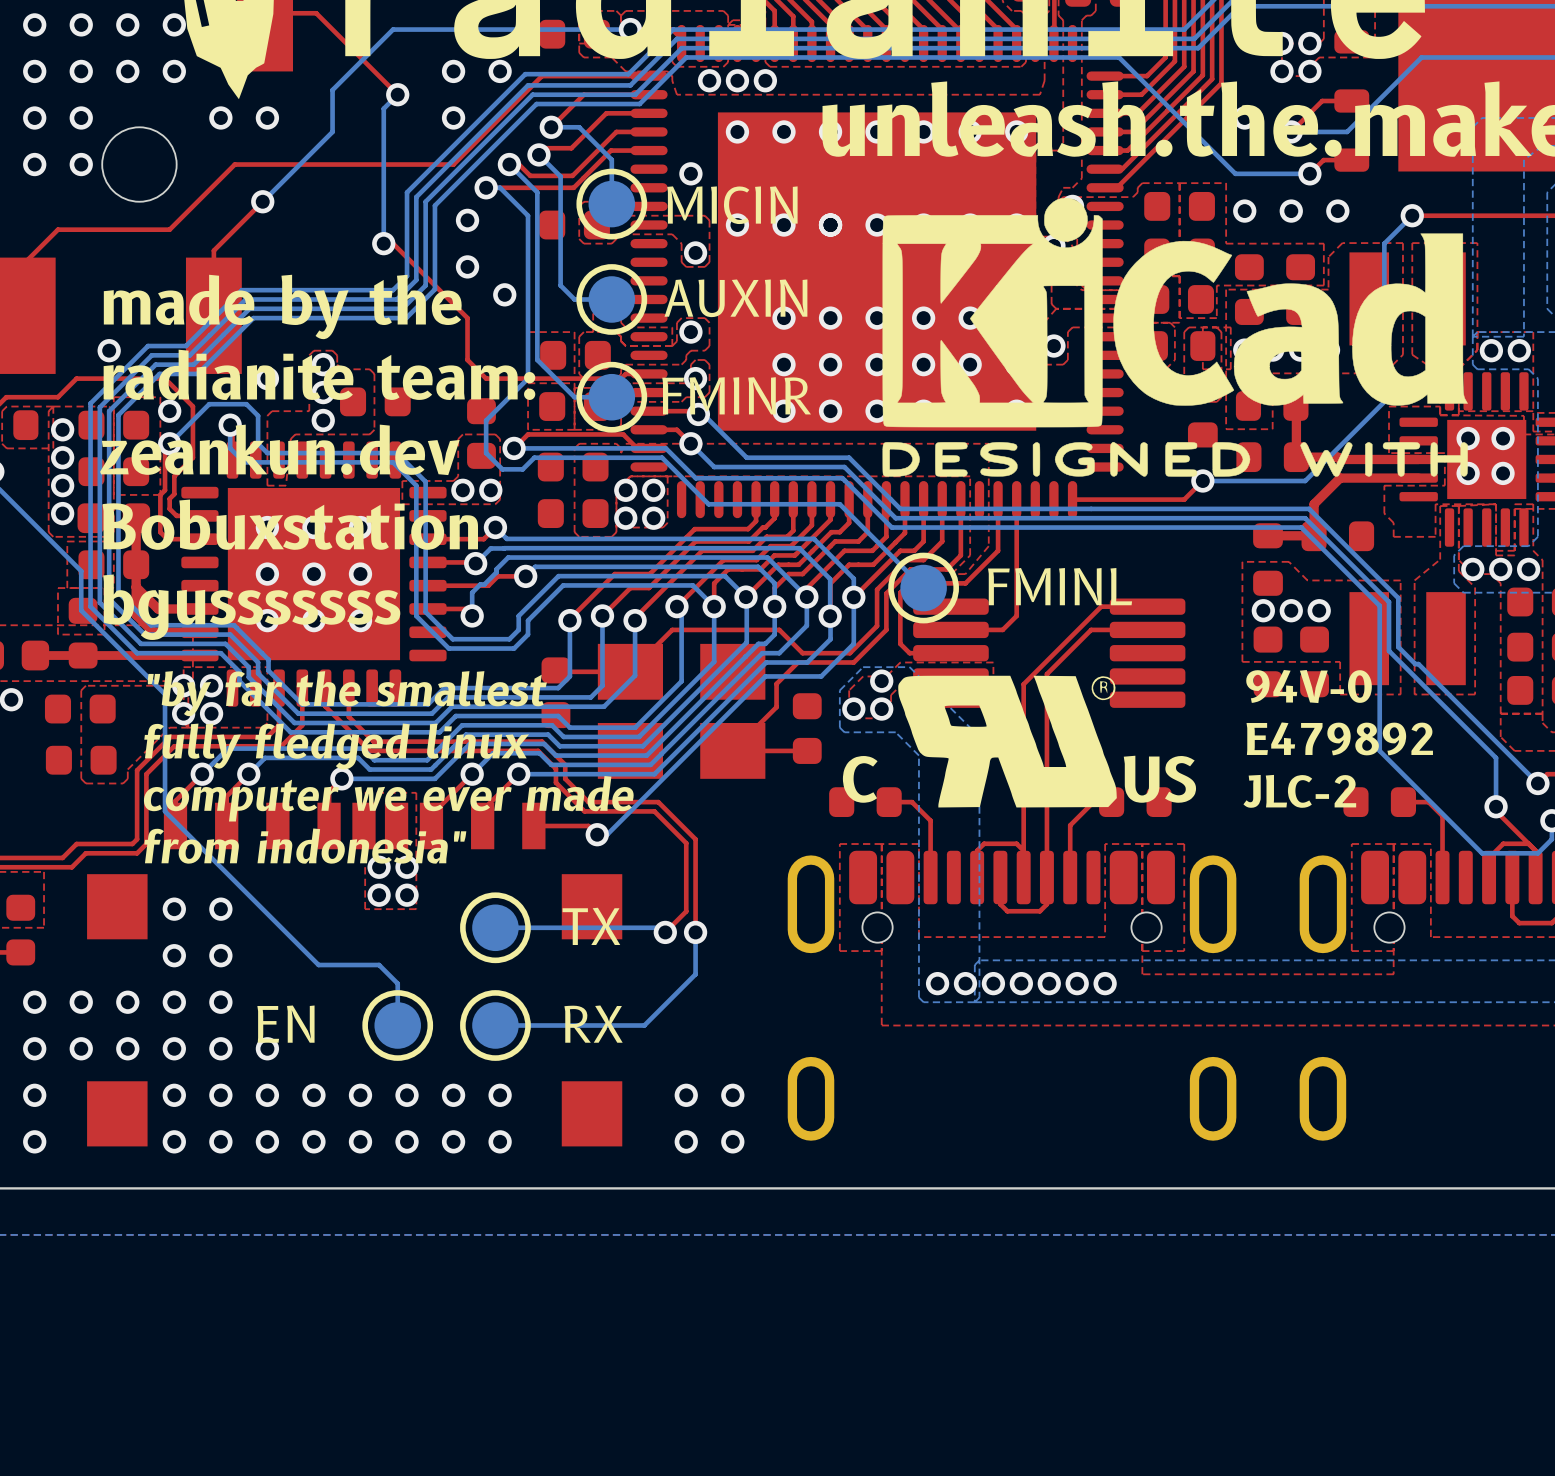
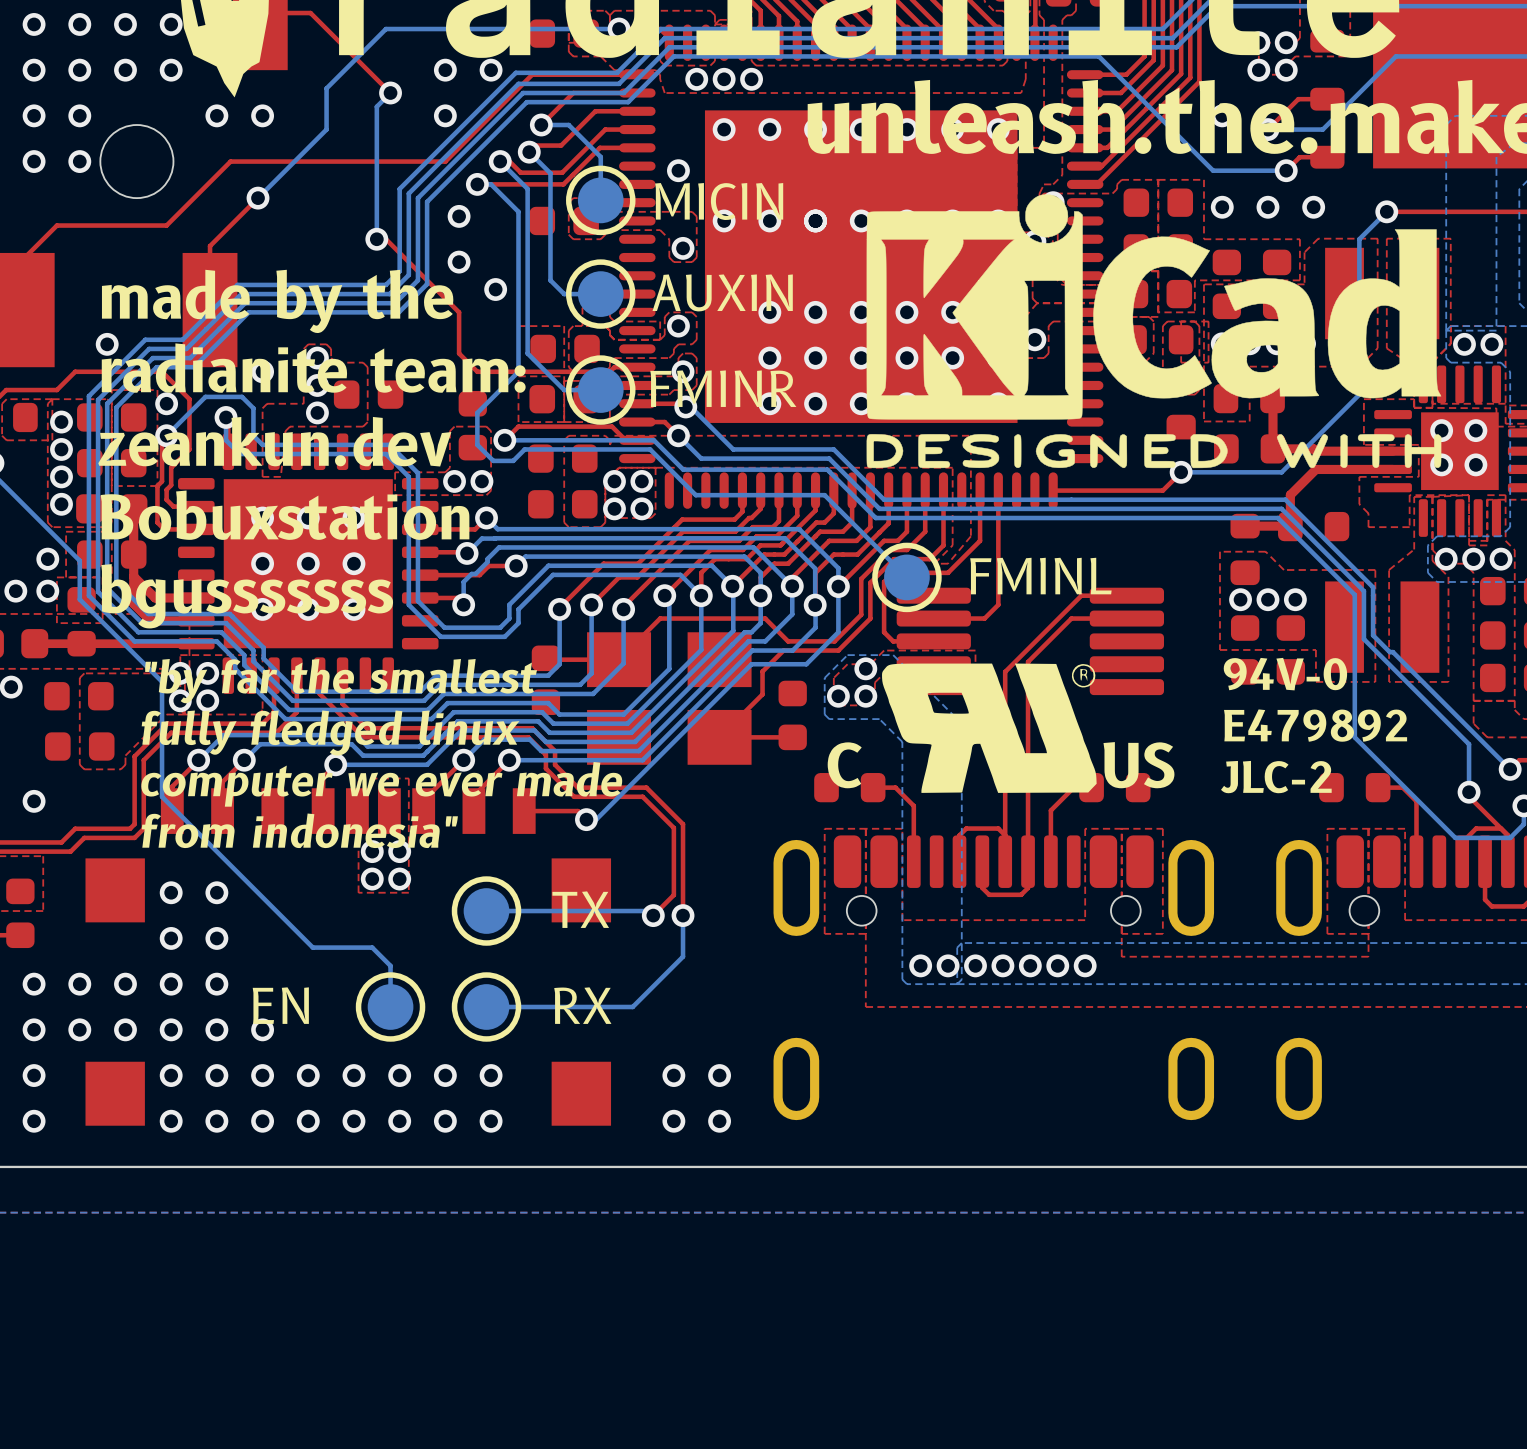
via: none -> (47, 559)
via: none -> (15, 591)
via: none -> (47, 591)
via: none -> (34, 801)

